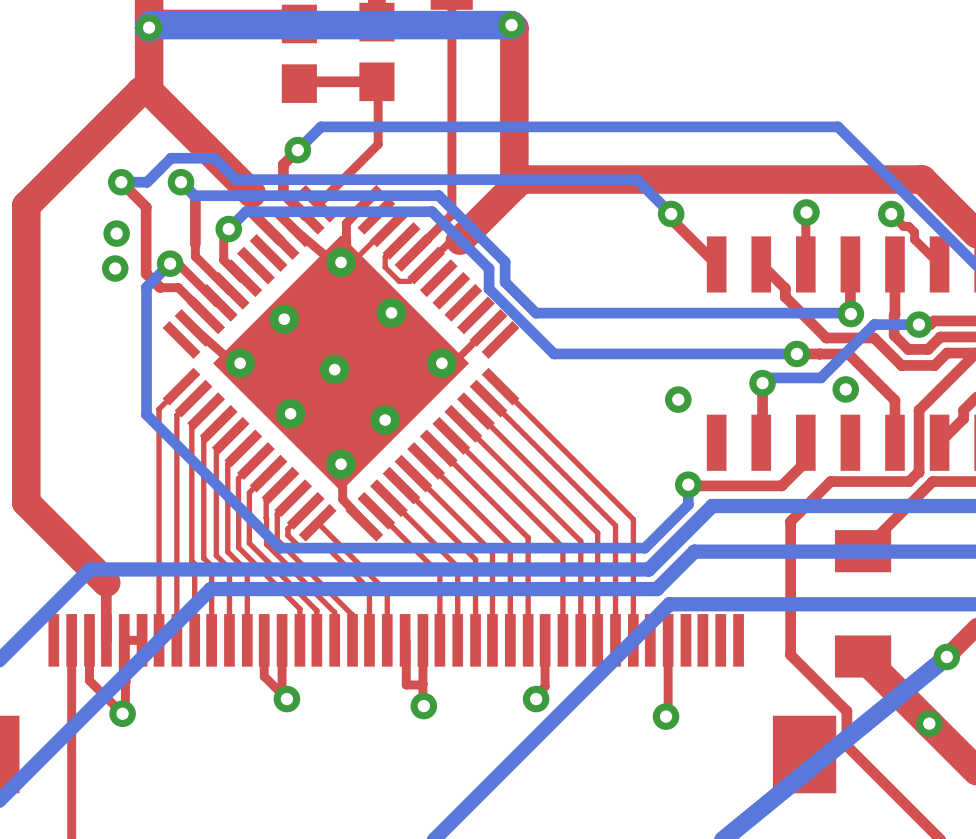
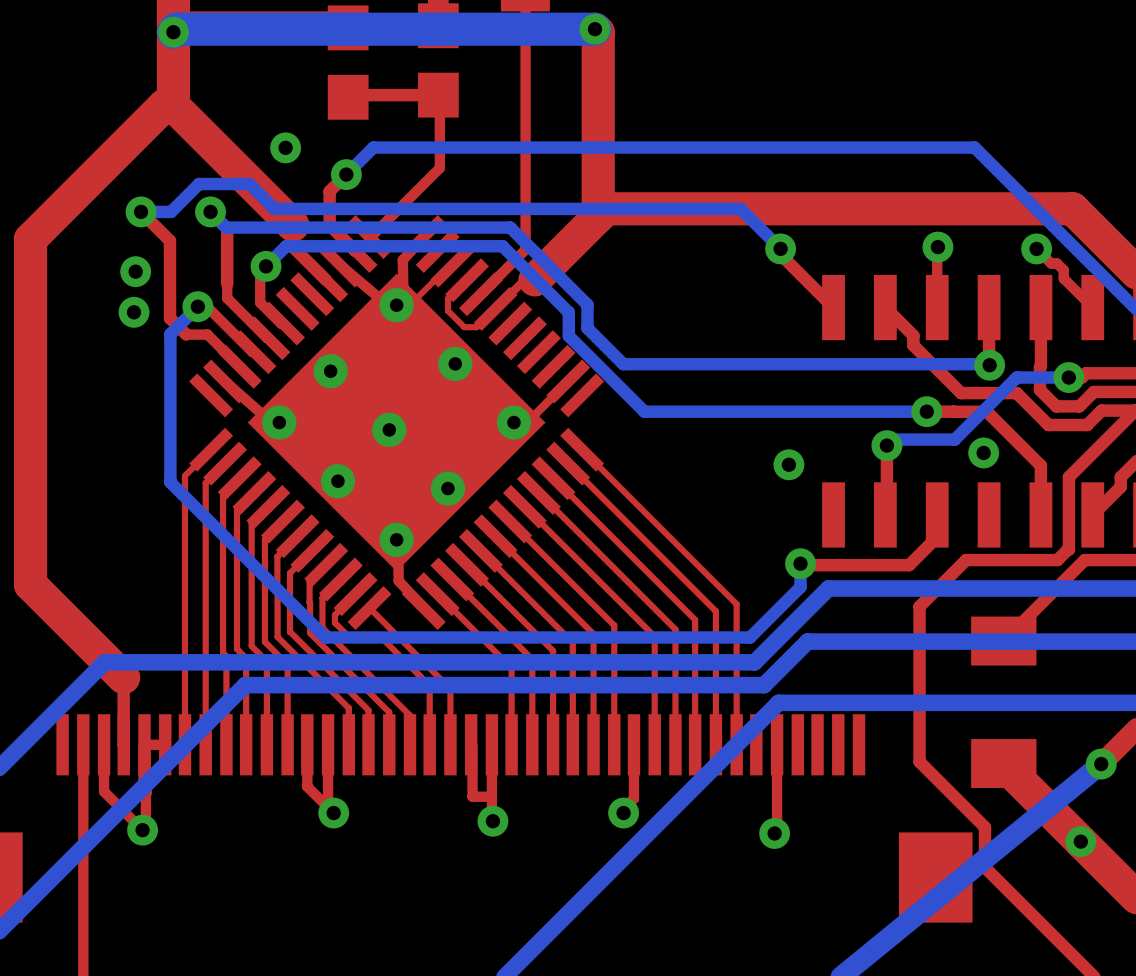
via: none -> (285, 147)

